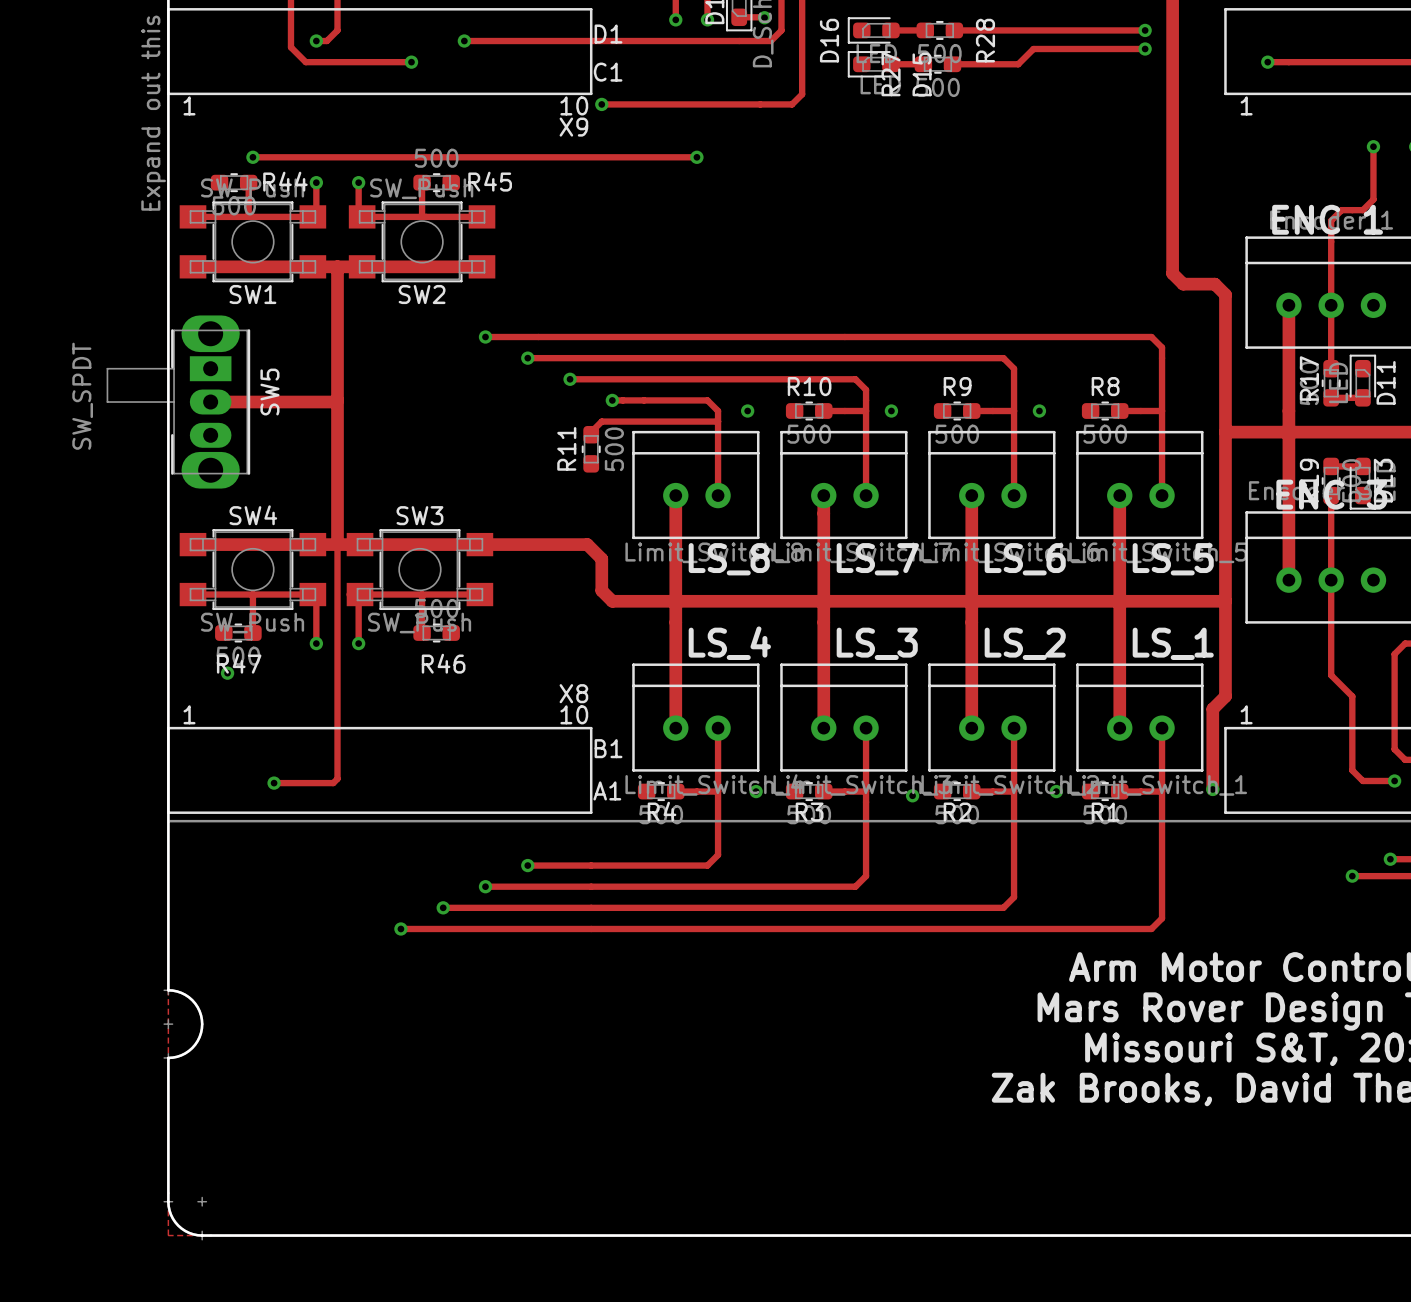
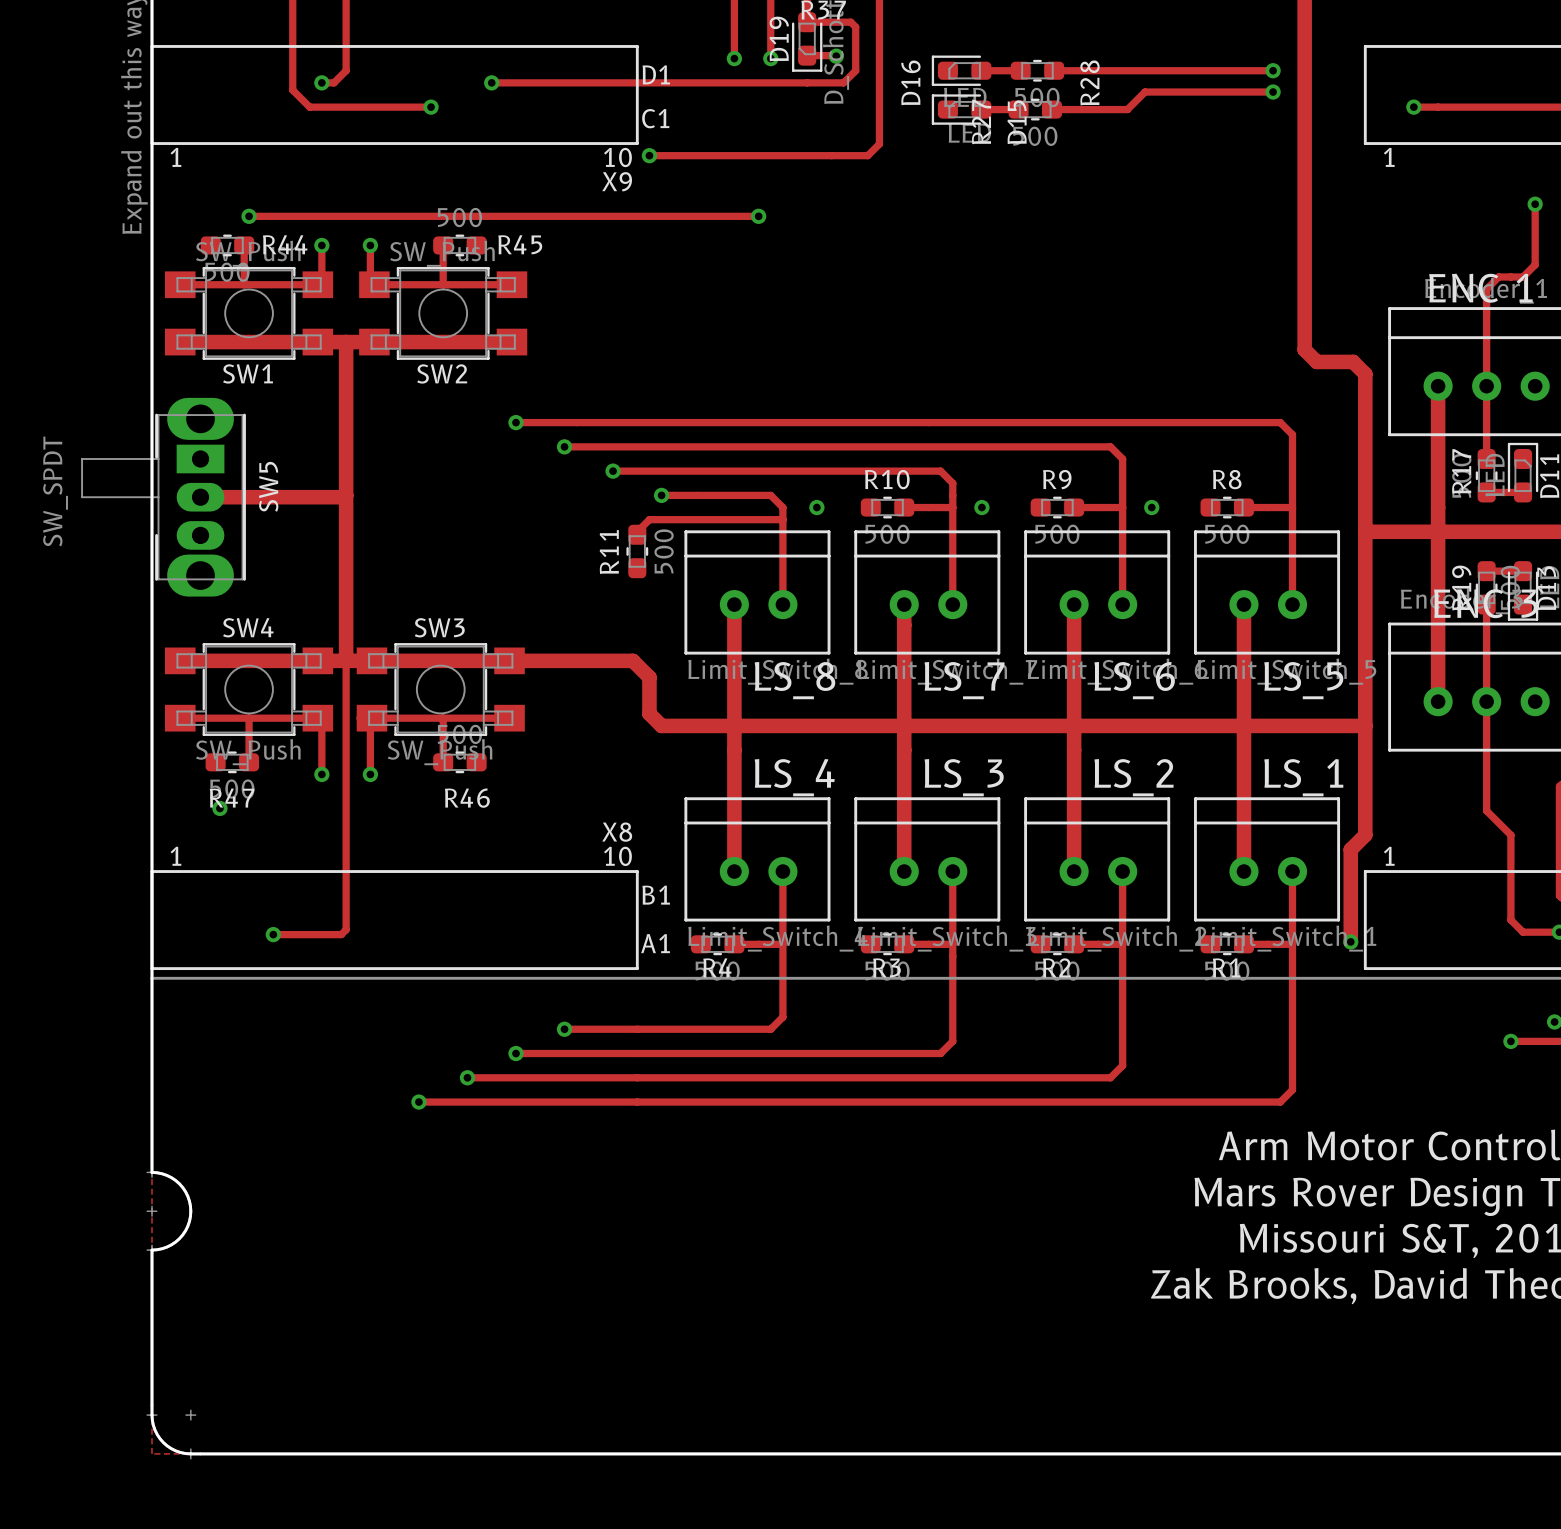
via: (756, 791) -> none
via: (1056, 791) -> none
via: (912, 795) -> none

